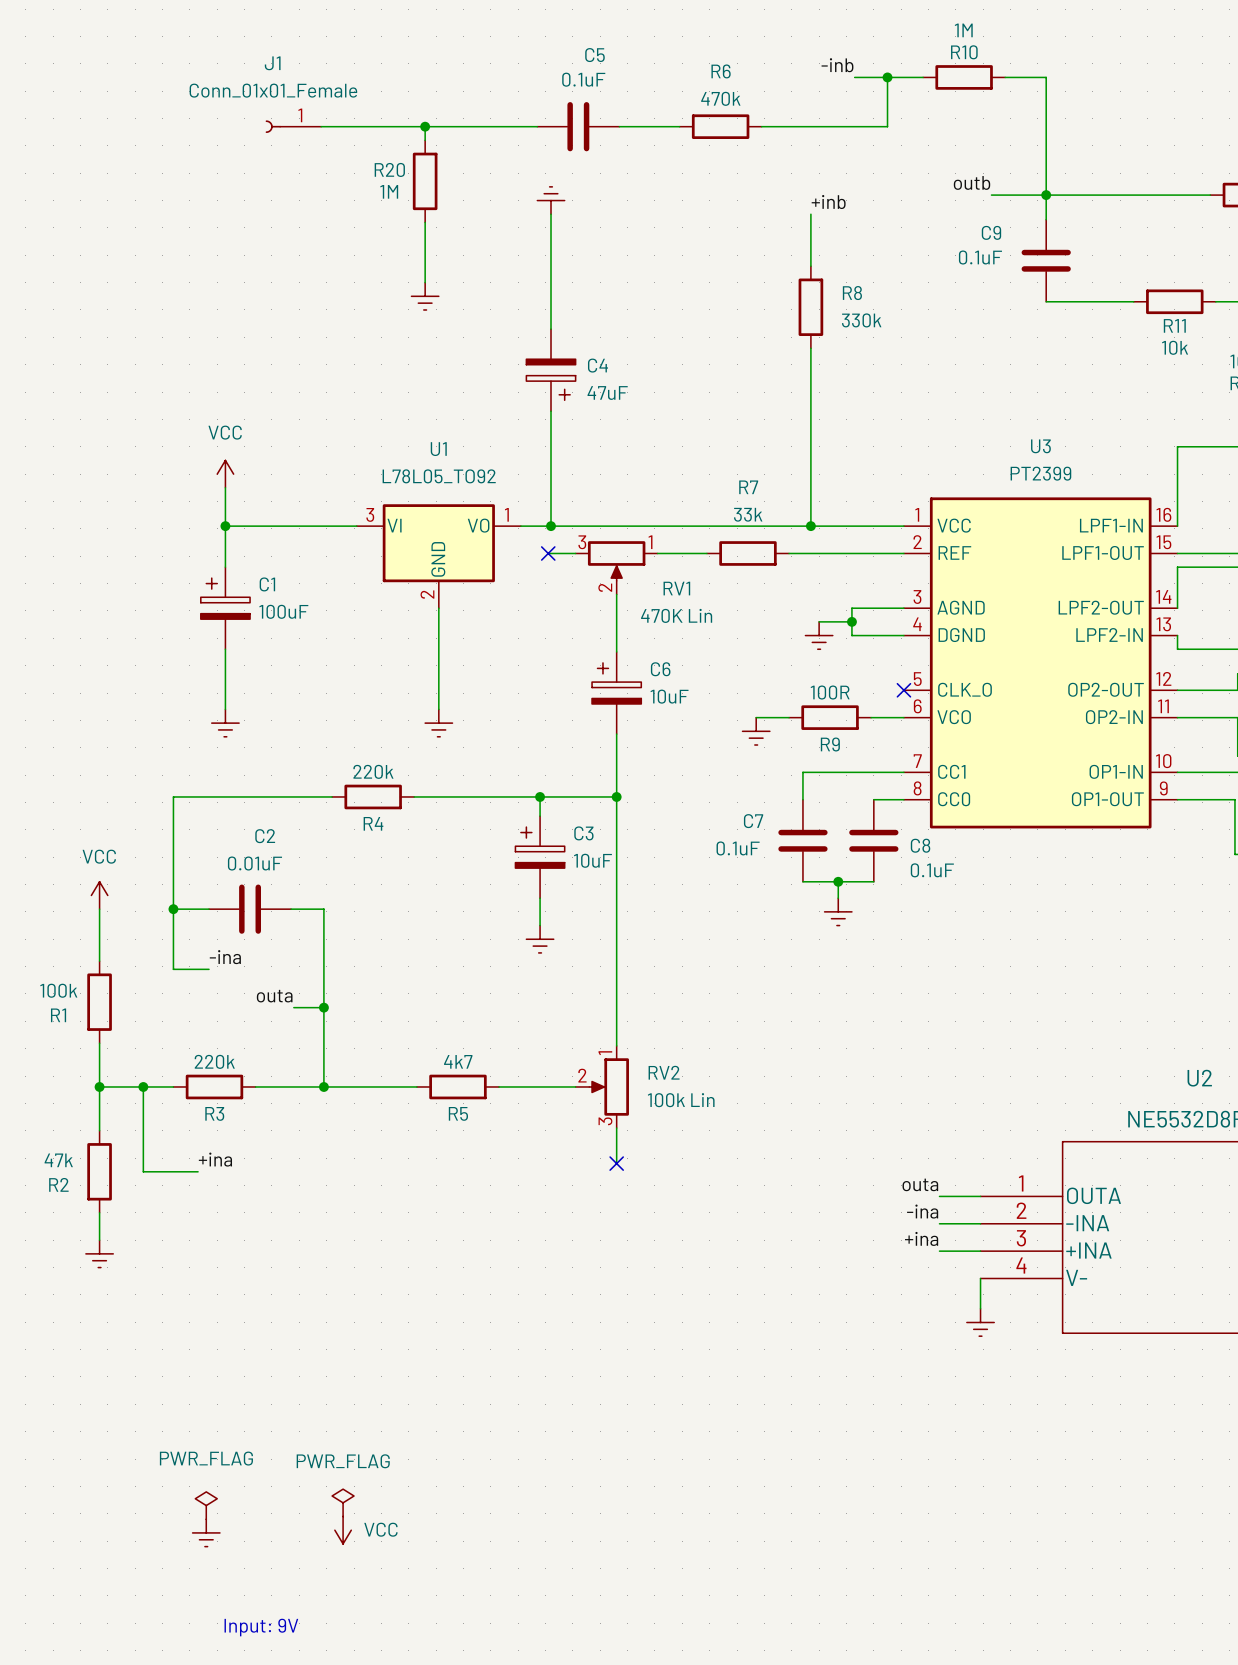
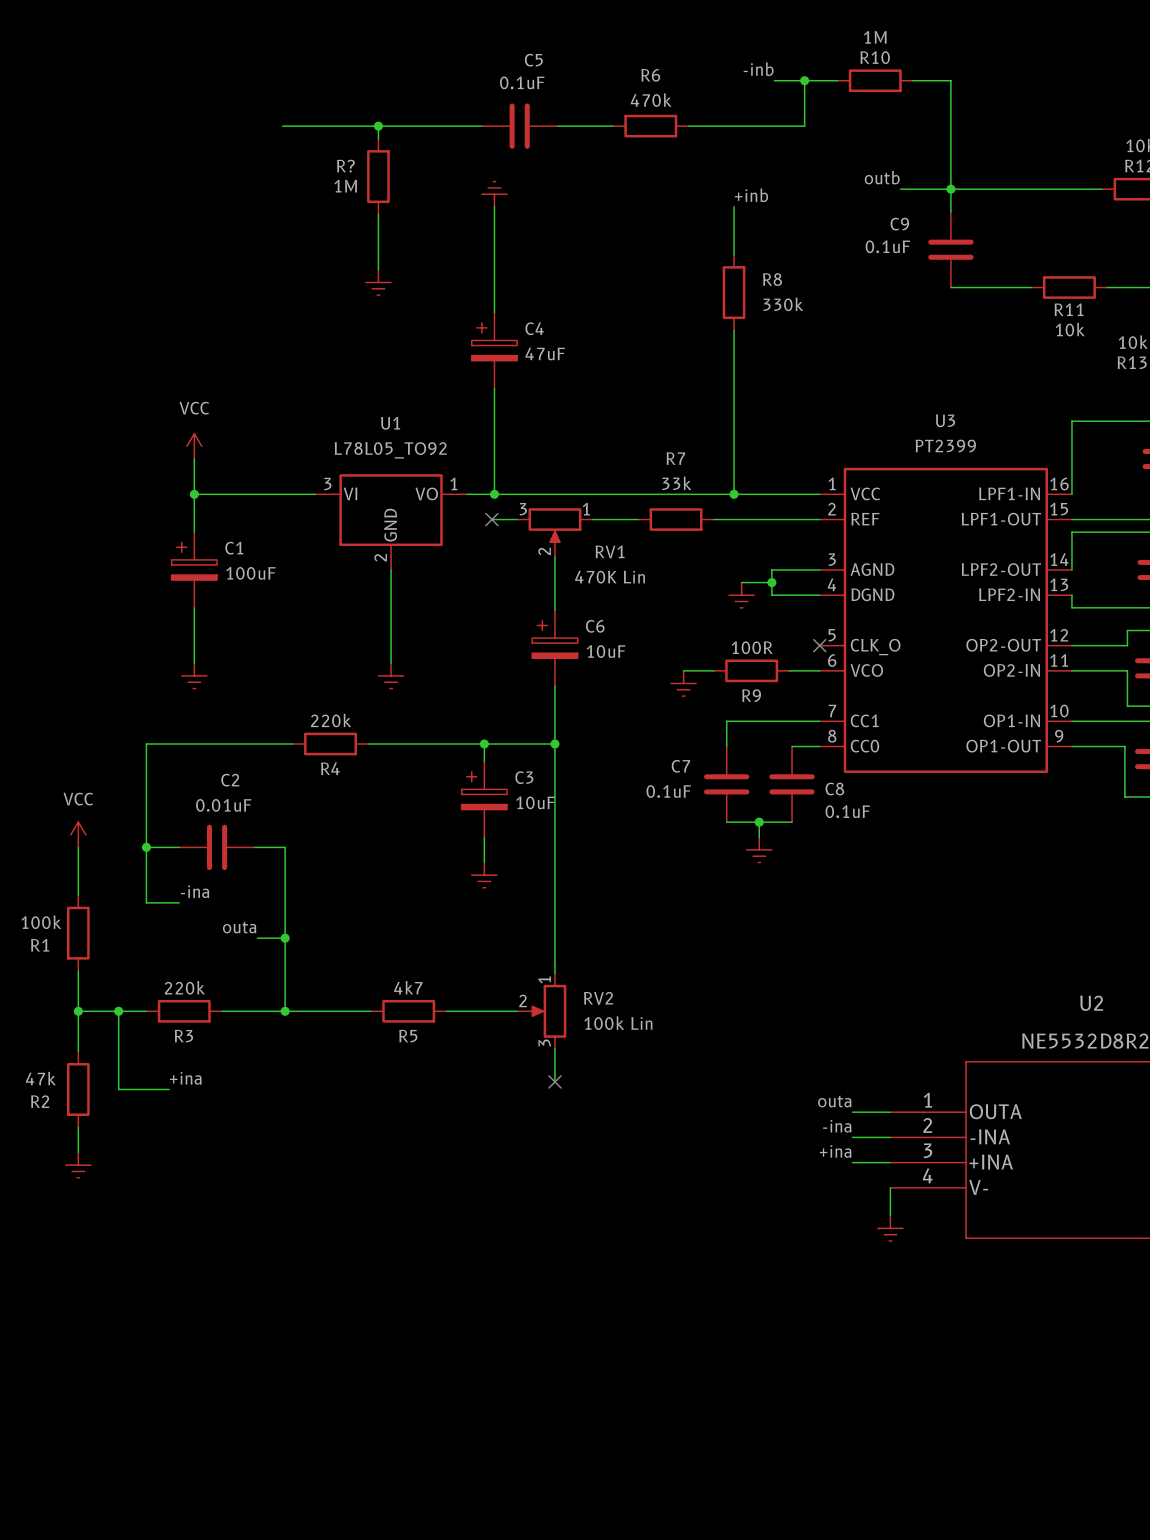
J1: Conn_01x01_Female (293, 126) -> none
R20 name: R20 (389, 169) -> R? (345, 166)
C4 rotation: 0° (551, 379) -> 180° (494, 341)
power symbol: PWR_FLAG (343, 1502) -> none
power symbol: PWR_FLAG (206, 1505) -> none
power symbol: VCC (343, 1530) -> none
power symbol: (206, 1532) -> none
text: Input: 9V (261, 1627) -> none

